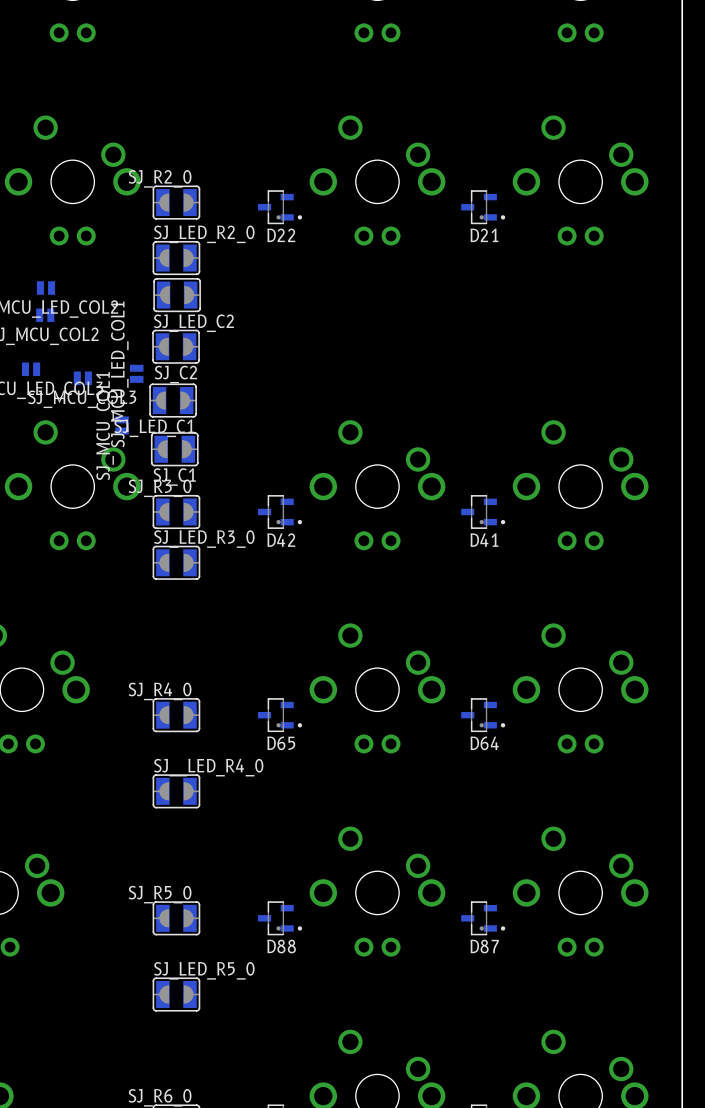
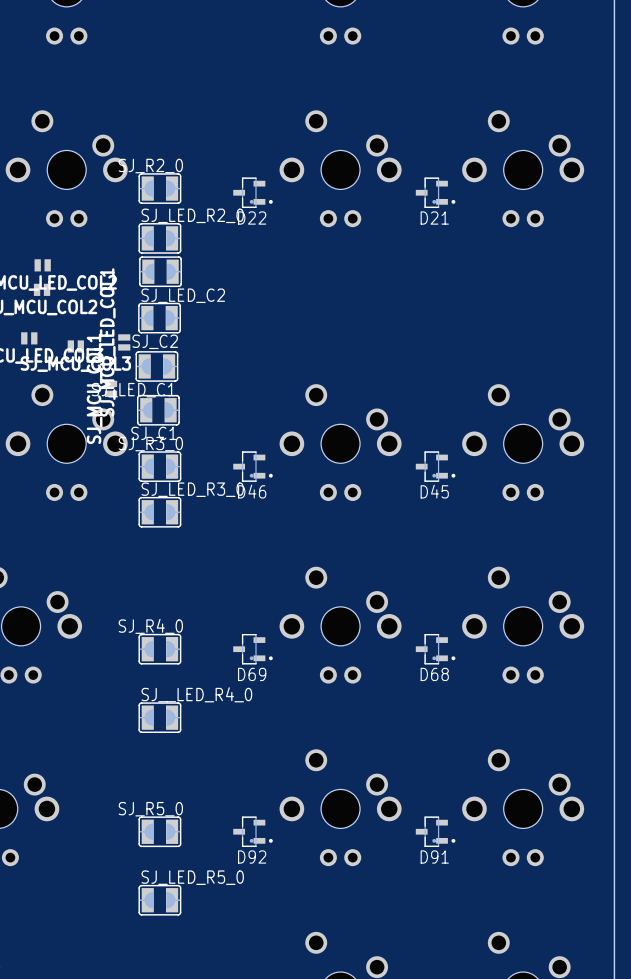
D42 name: D42 (281, 540) -> D46 (252, 491)
D41 name: D41 (484, 540) -> D45 (434, 491)
D65 name: D65 (281, 743) -> D69 (252, 674)
D64 name: D64 (484, 743) -> D68 (434, 674)
D88 name: D88 (281, 946) -> D92 (252, 857)
D87 name: D87 (484, 946) -> D91 (434, 857)

